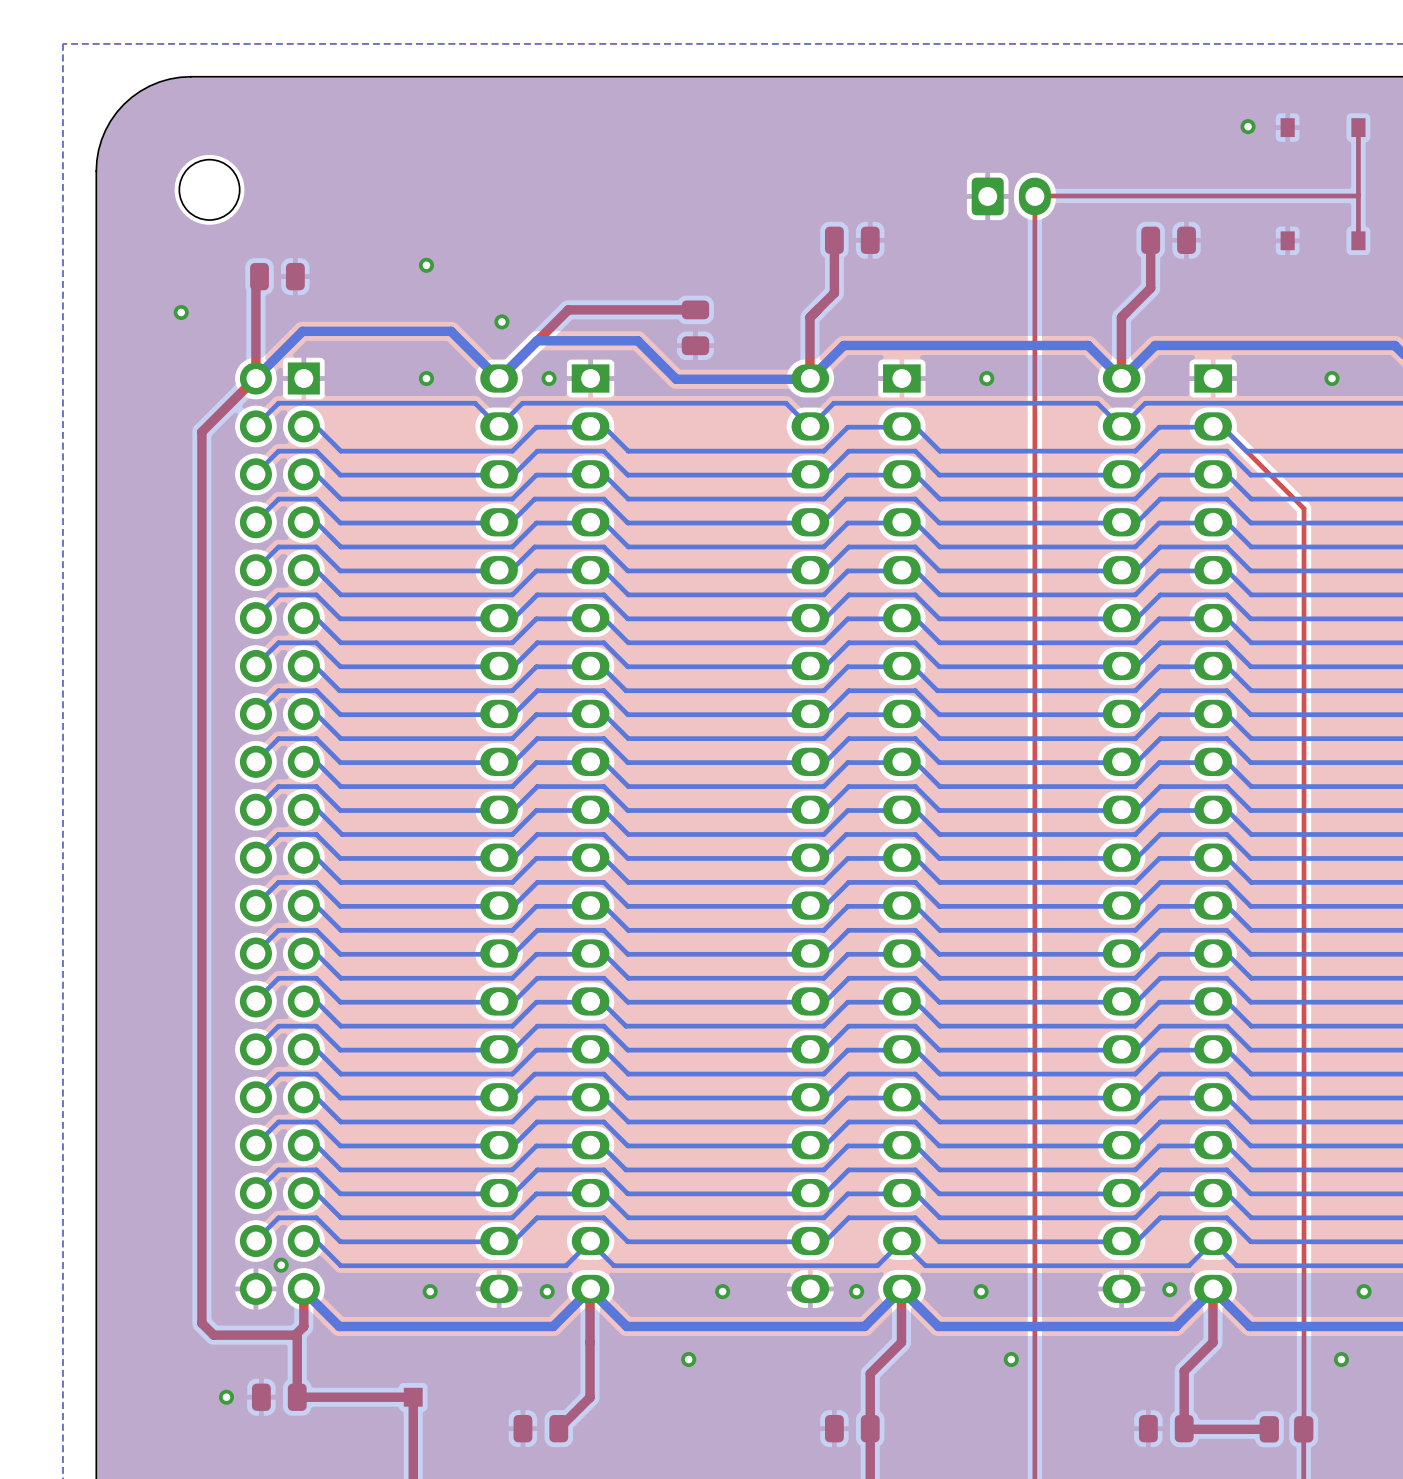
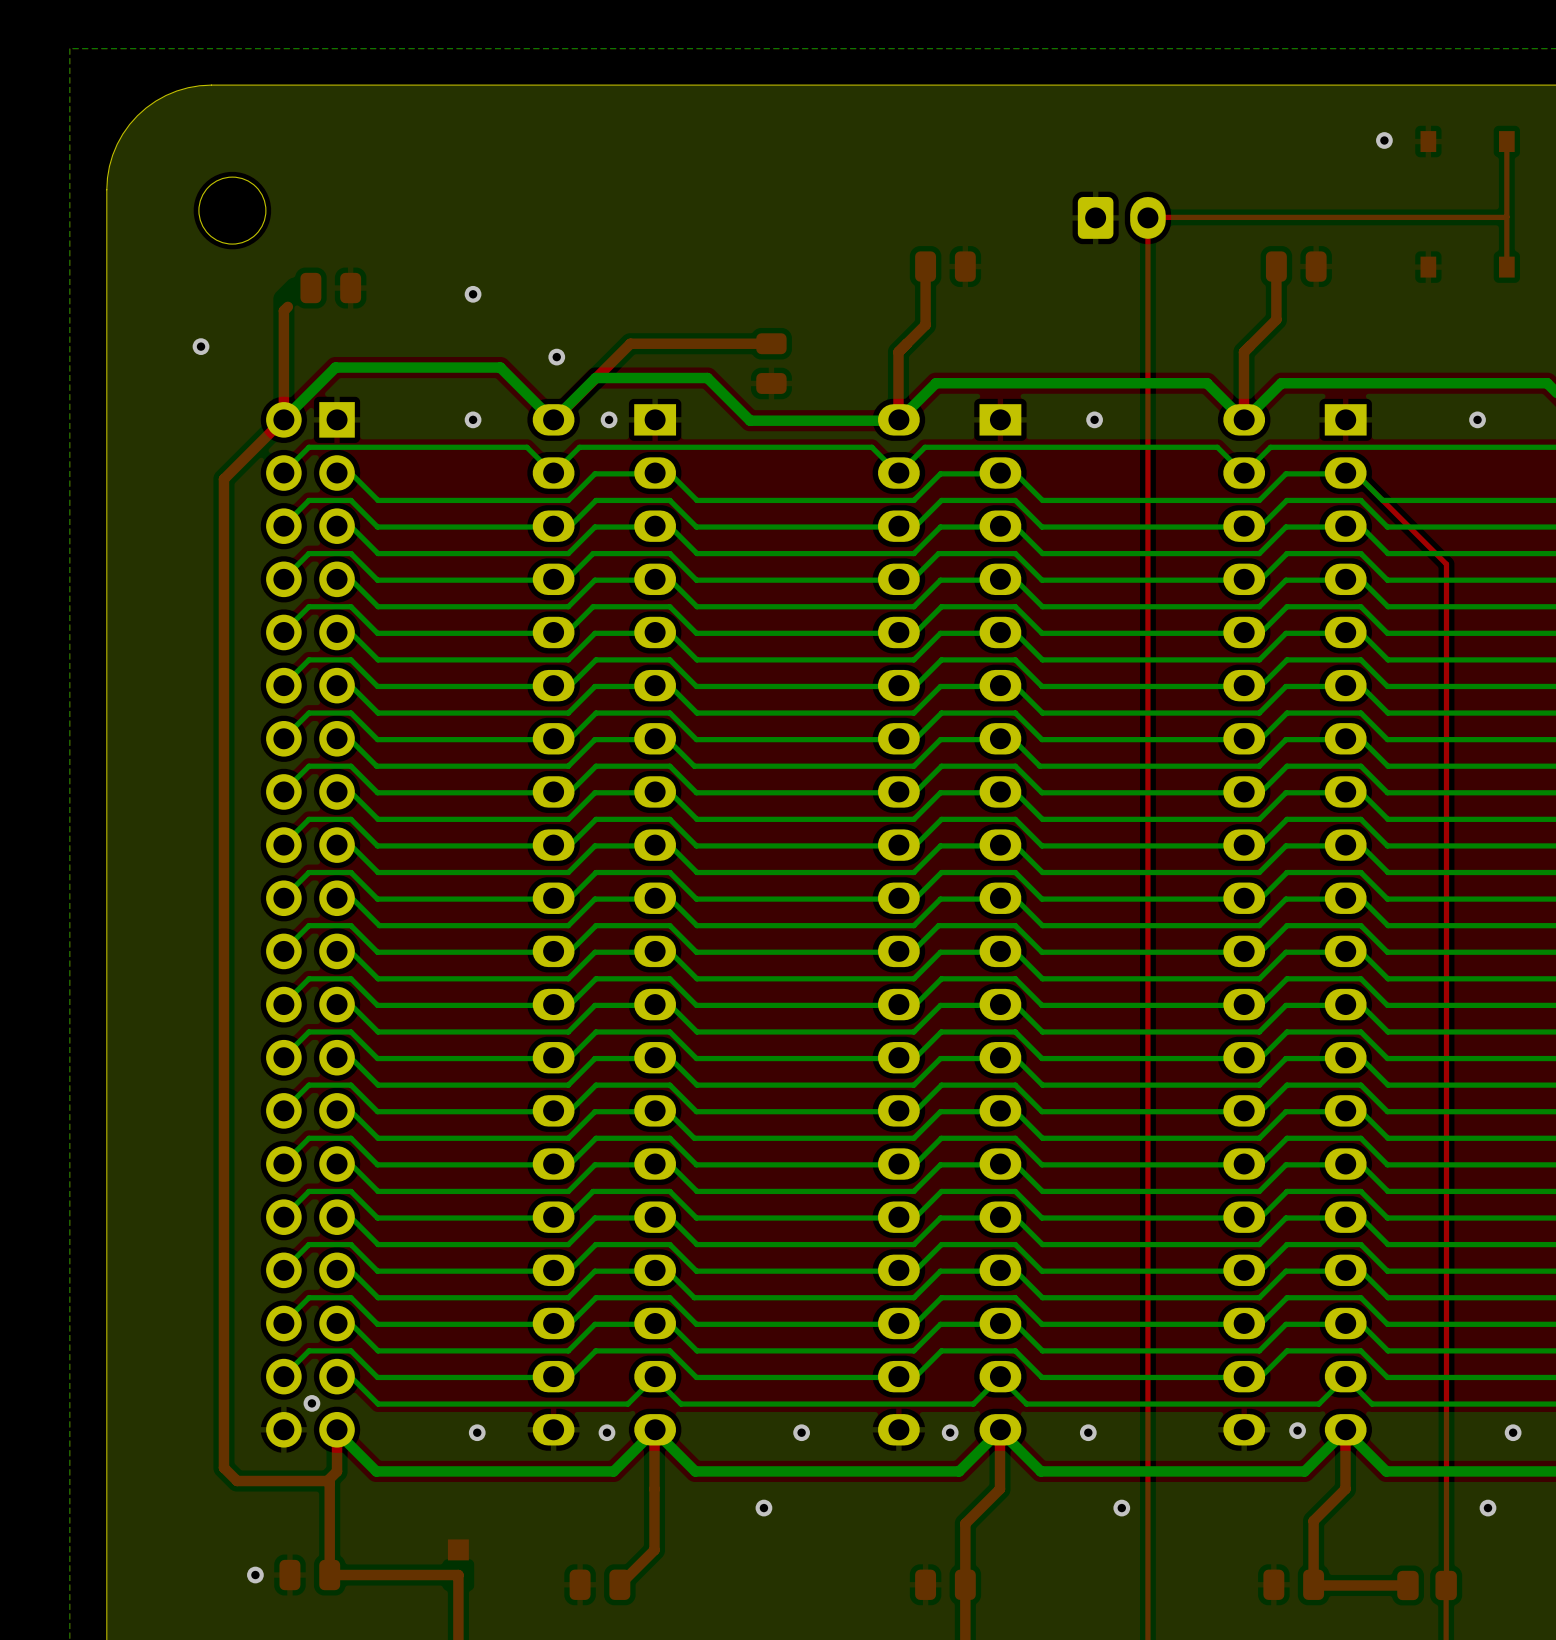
part position: (277, 276) -> (330, 288)
via position: (226, 1397) -> (255, 1575)
part position: (279, 1397) -> (309, 1575)
top track: (297, 1397) (413, 1397) (413, 1419) -> (329, 1549) (329, 1575) (458, 1575)

